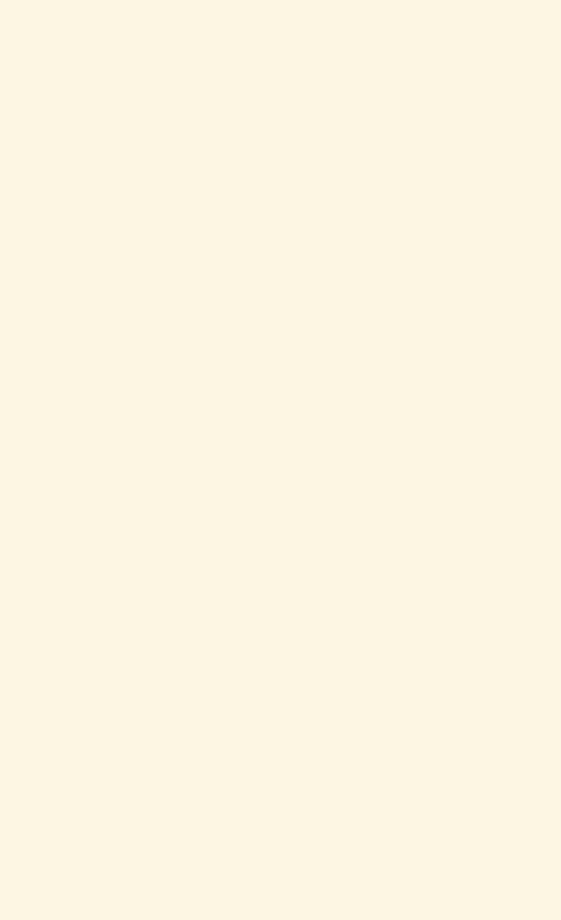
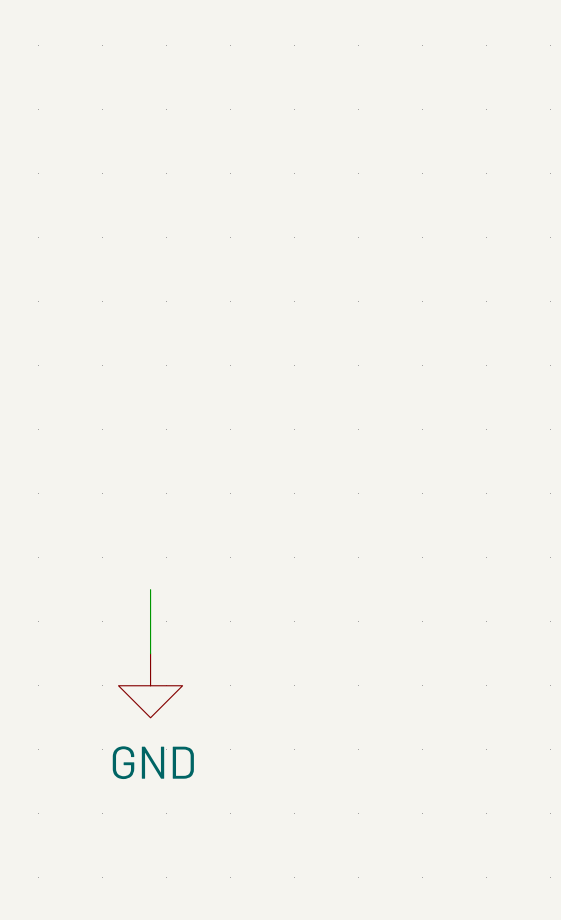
wire: none -> (150, 589) (150, 653)
power symbol: none -> GND (150, 685)

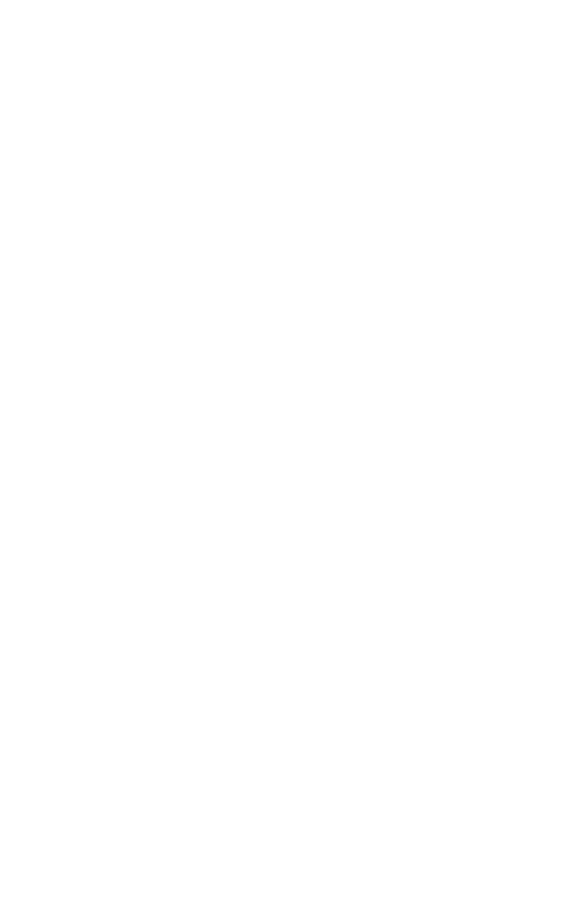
wire: (150, 589) (150, 653) -> none
power symbol: GND (150, 685) -> none

